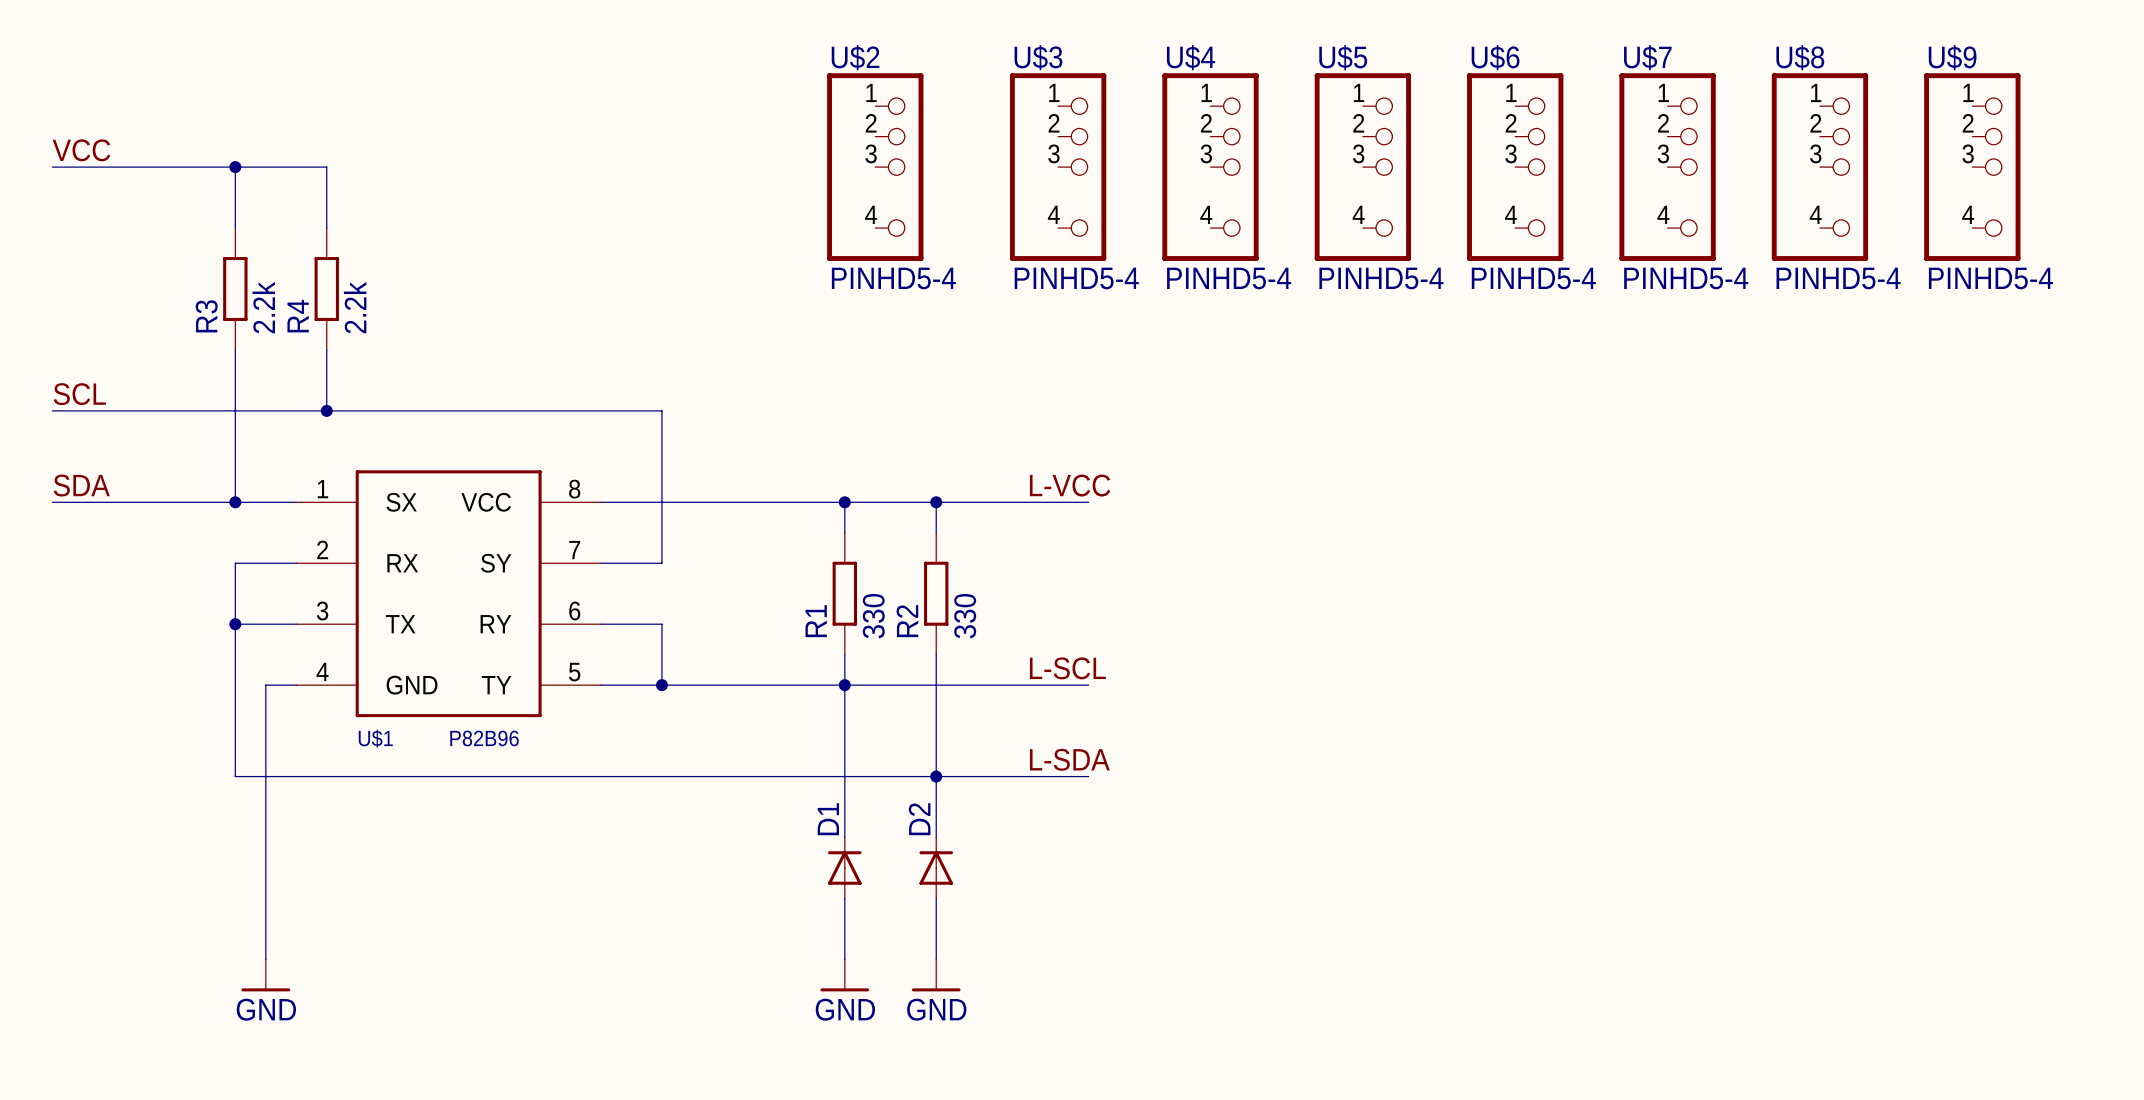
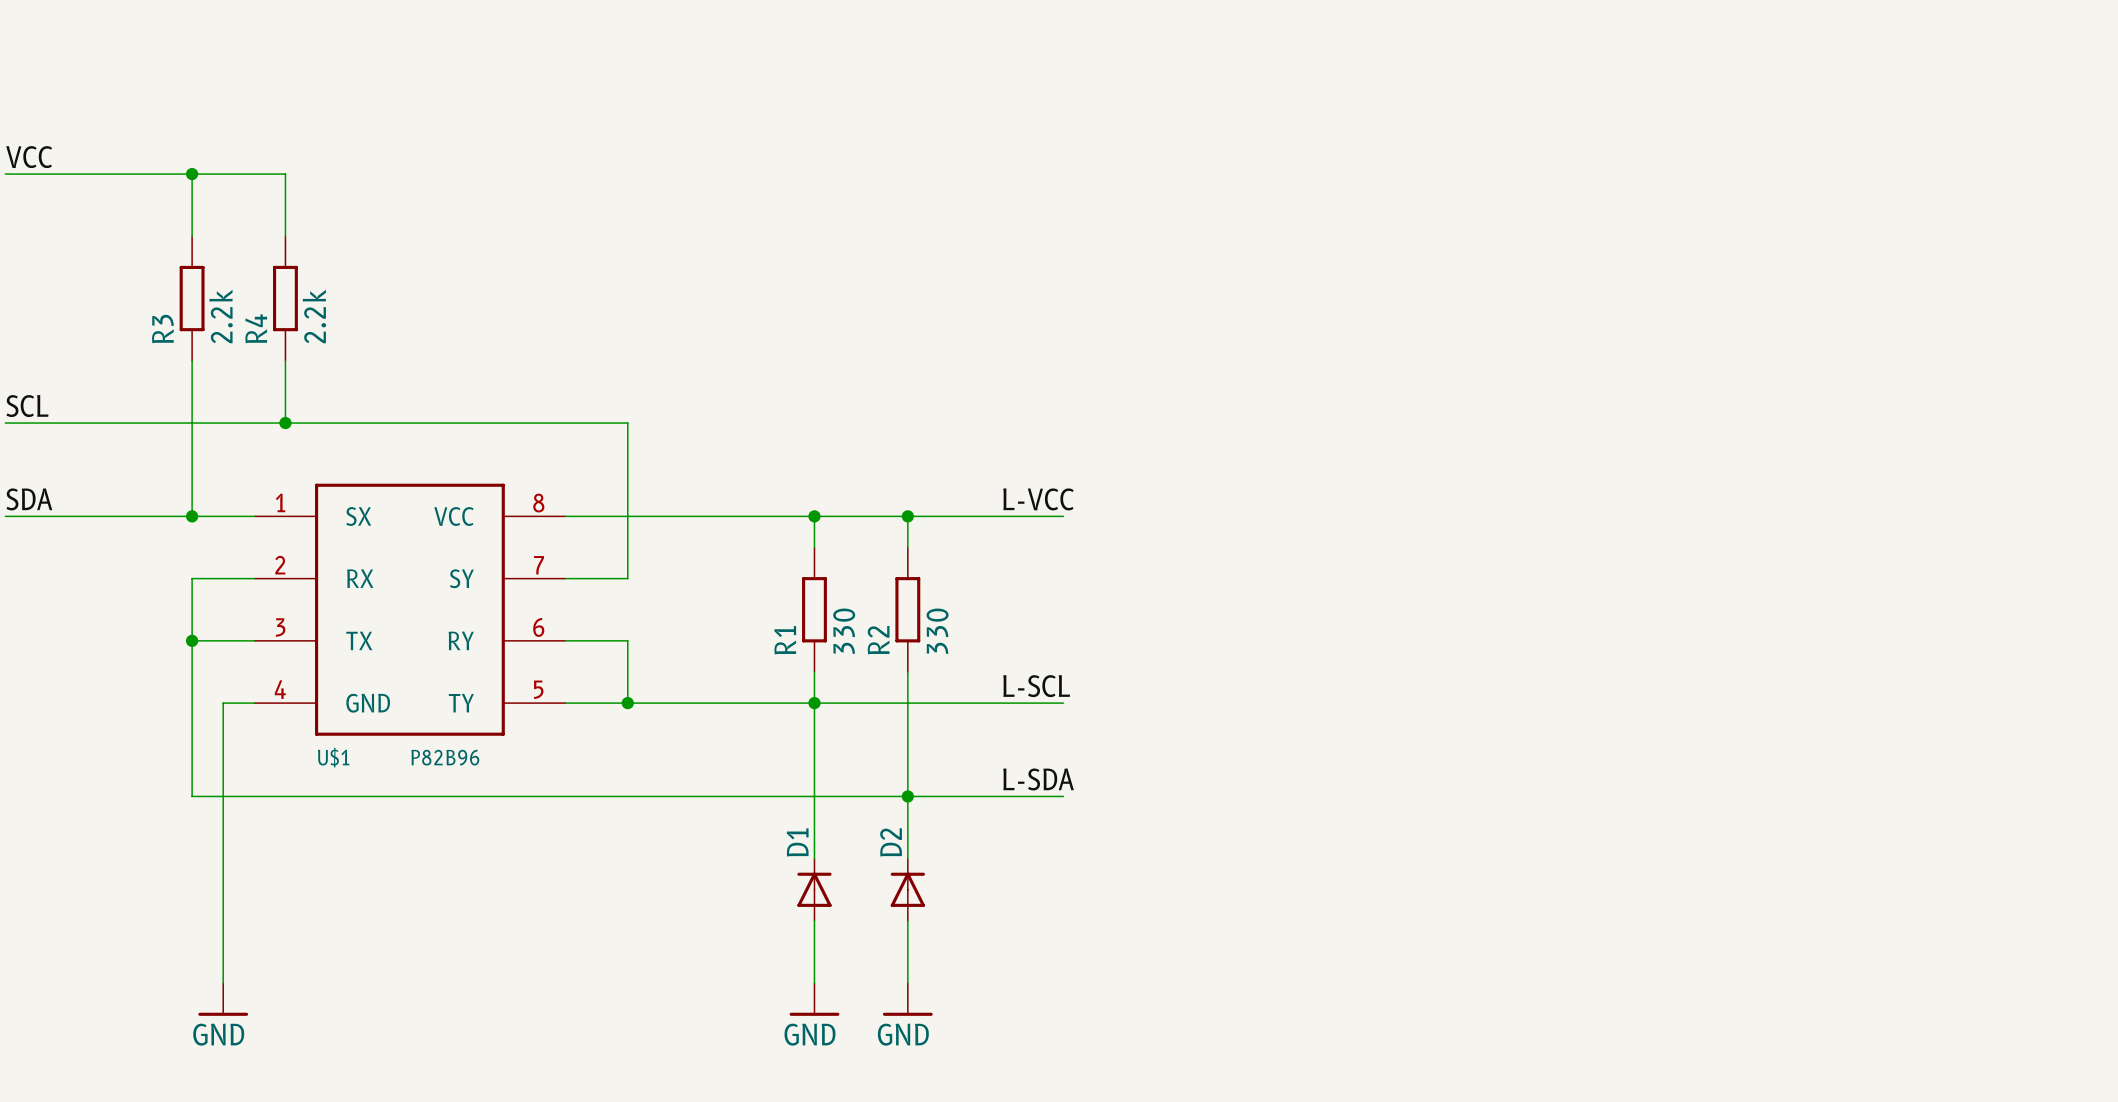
U$2: PINHD5-4 (875, 167) -> none
U$3: PINHD5-4 (1058, 167) -> none
U$4: PINHD5-4 (1210, 167) -> none
U$5: PINHD5-4 (1362, 167) -> none
U$6: PINHD5-4 (1515, 167) -> none
U$7: PINHD5-4 (1667, 167) -> none
U$8: PINHD5-4 (1819, 167) -> none
U$9: PINHD5-4 (1972, 167) -> none

